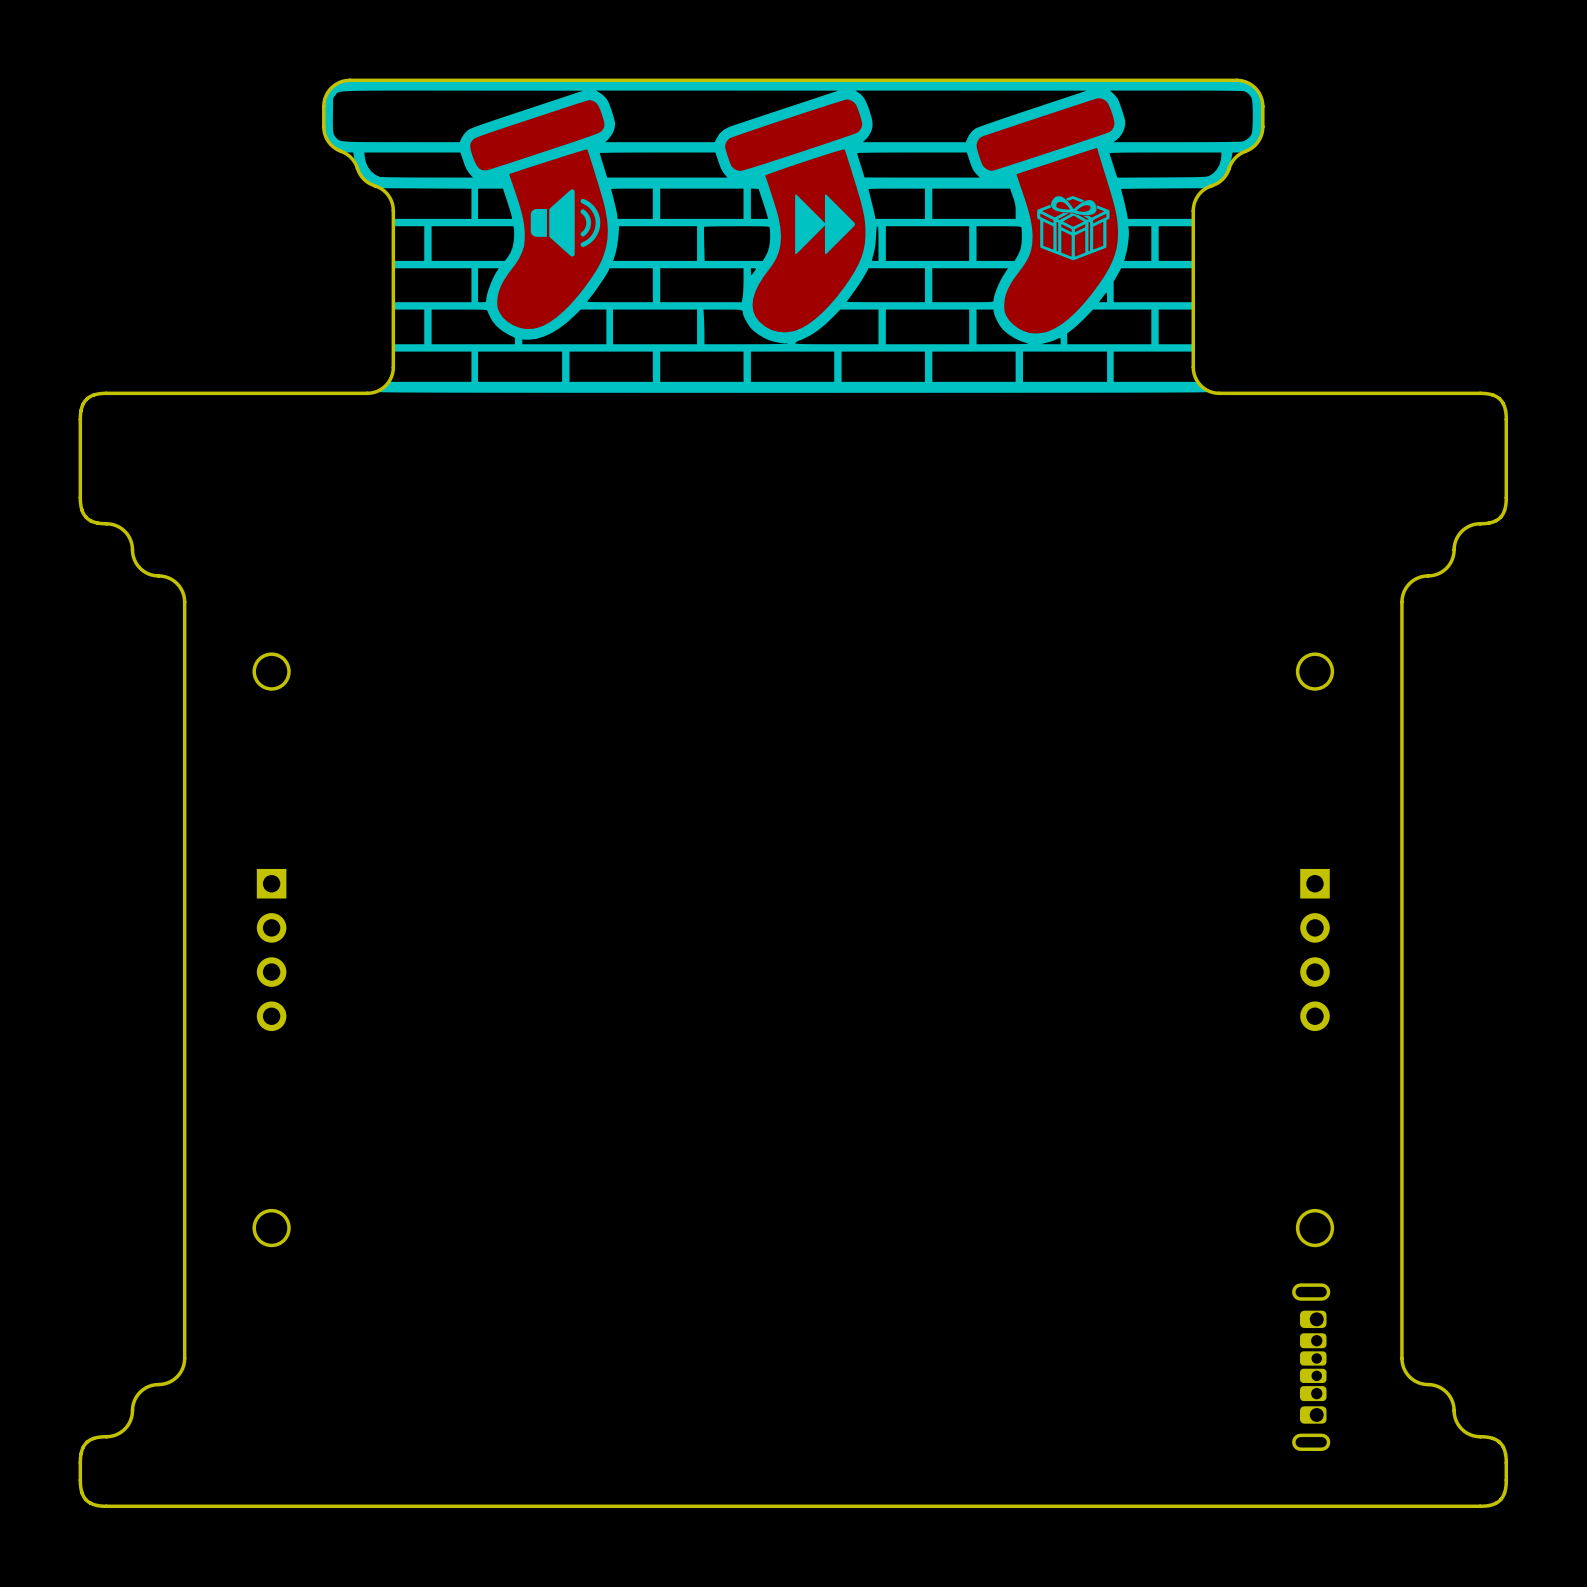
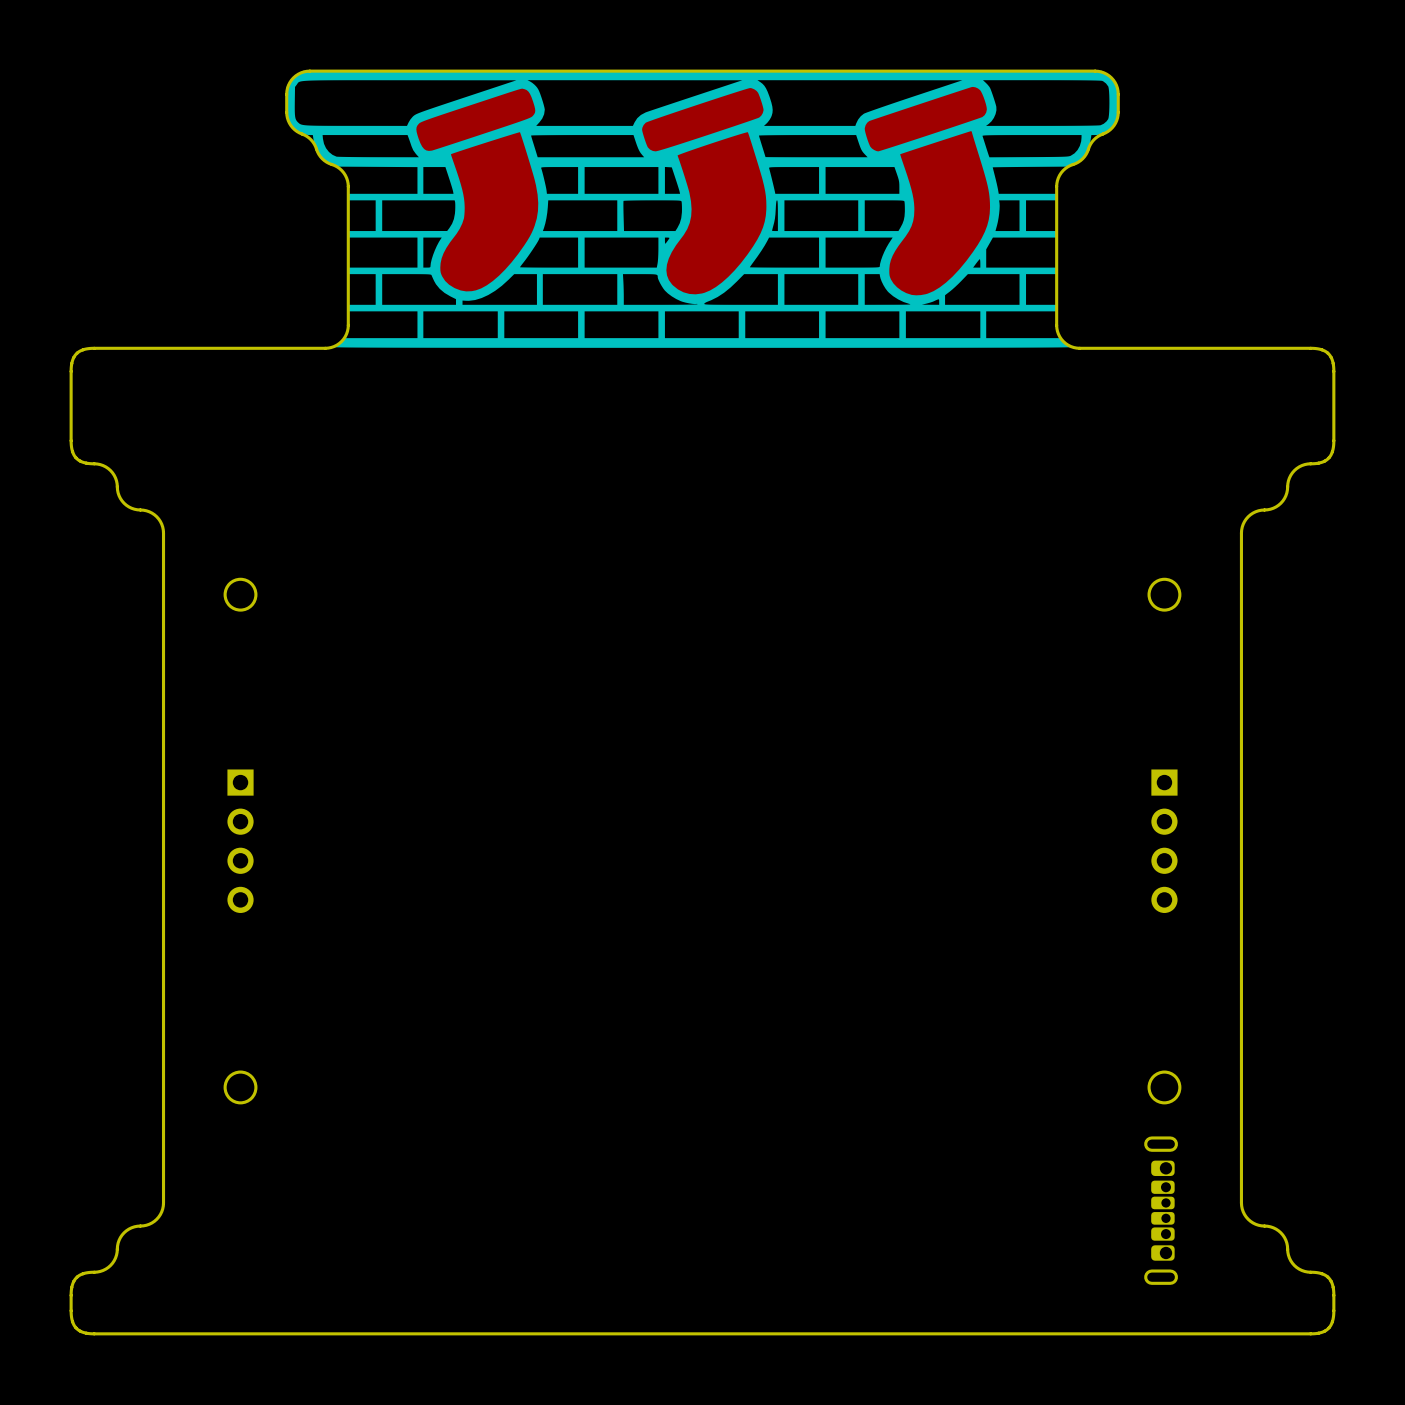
drawing: [530, 189, 601, 257] -> none
drawing: [795, 194, 855, 255] -> none
drawing: [1037, 196, 1110, 261] -> none

